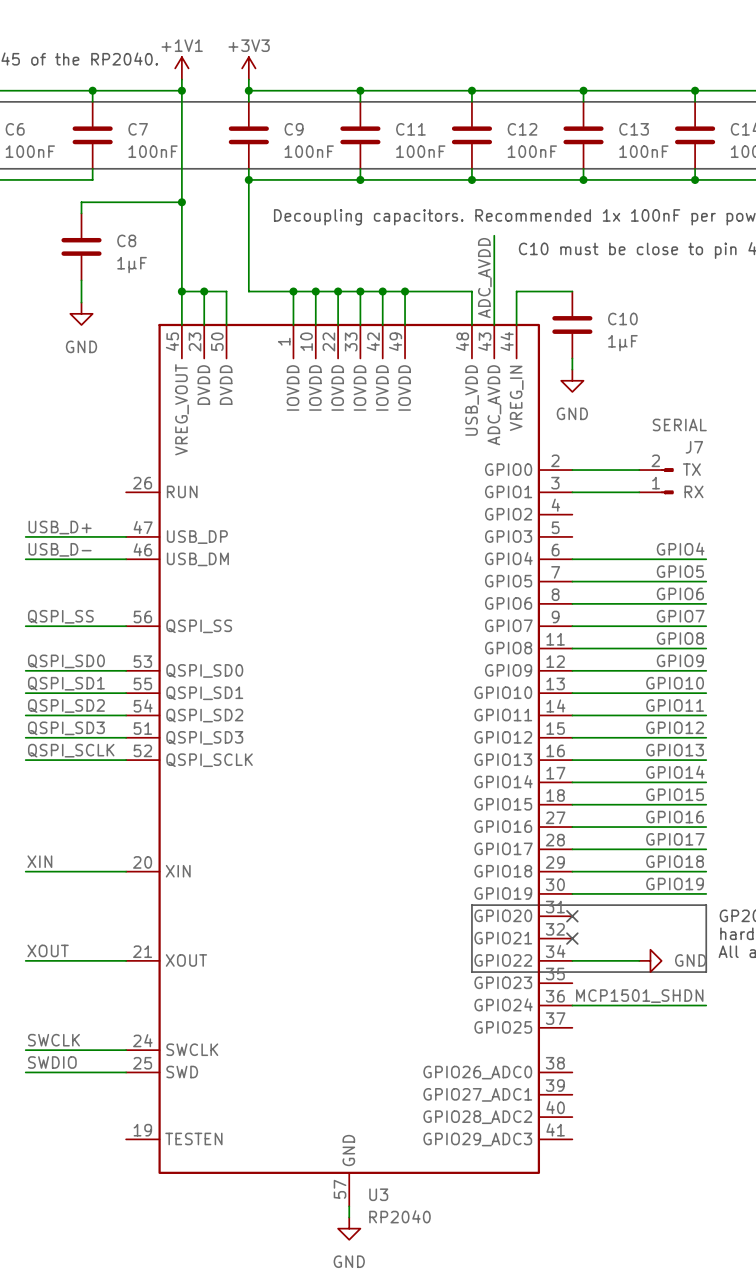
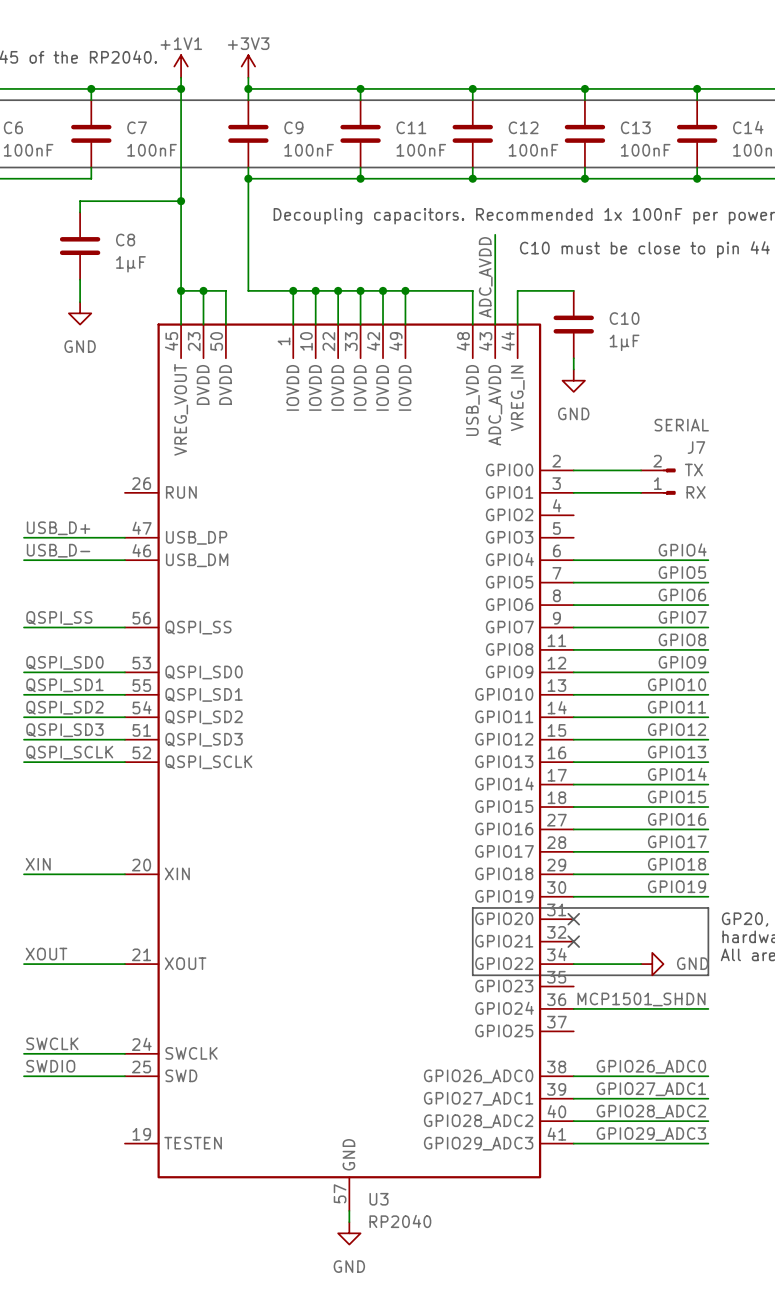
label: none -> GPIO26_ADC0 (651, 1066)
wire: none -> (573, 1076) (708, 1076)
label: none -> GPIO27_ADC1 (651, 1089)
wire: none -> (573, 1098) (708, 1098)
label: none -> GPIO28_ADC2 (651, 1111)
wire: none -> (573, 1121) (708, 1121)
label: none -> GPIO29_ADC3 (651, 1134)
wire: none -> (573, 1143) (708, 1143)

